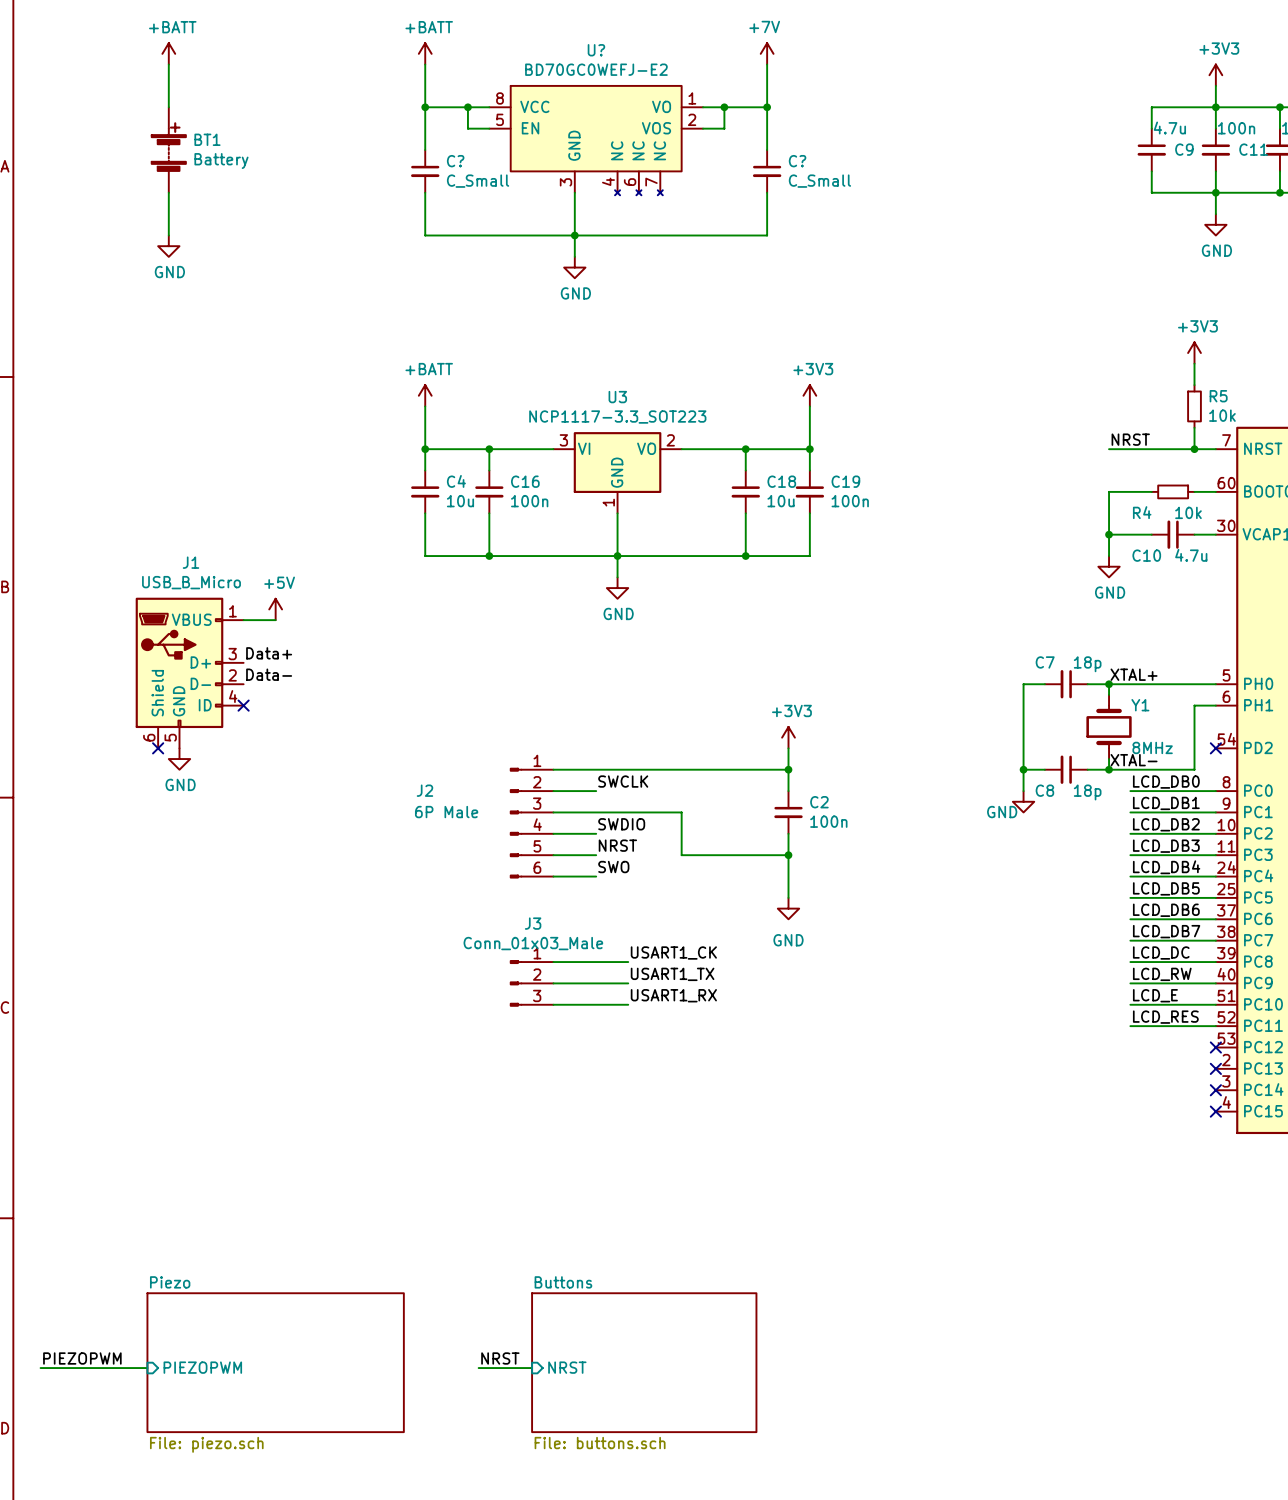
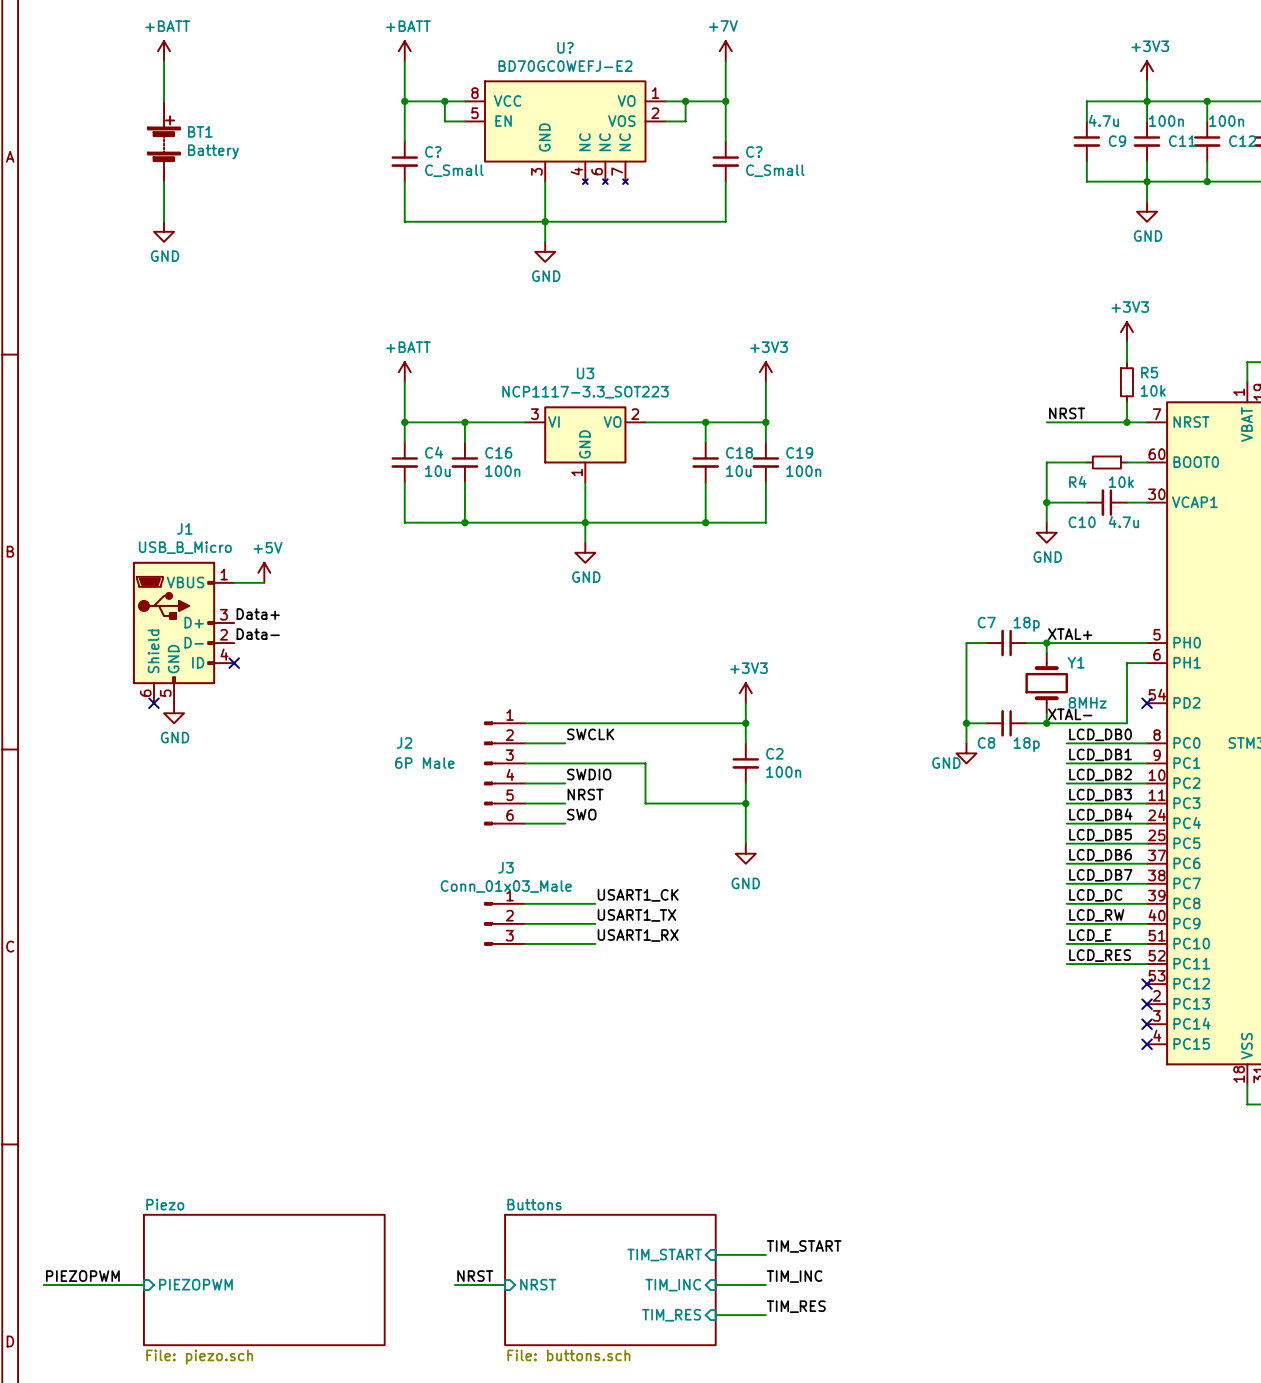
label: none -> TIM_START (804, 1246)
wire: none -> (715, 1254) (765, 1254)
sheet pin: none -> TIM_START (664, 1255)
label: none -> TIM_INC (794, 1276)
sheet pin: none -> TIM_INC (673, 1285)
wire: none -> (715, 1285) (765, 1285)
label: none -> TIM_RES (796, 1306)
sheet pin: none -> TIM_RES (671, 1315)
wire: none -> (715, 1315) (765, 1315)

